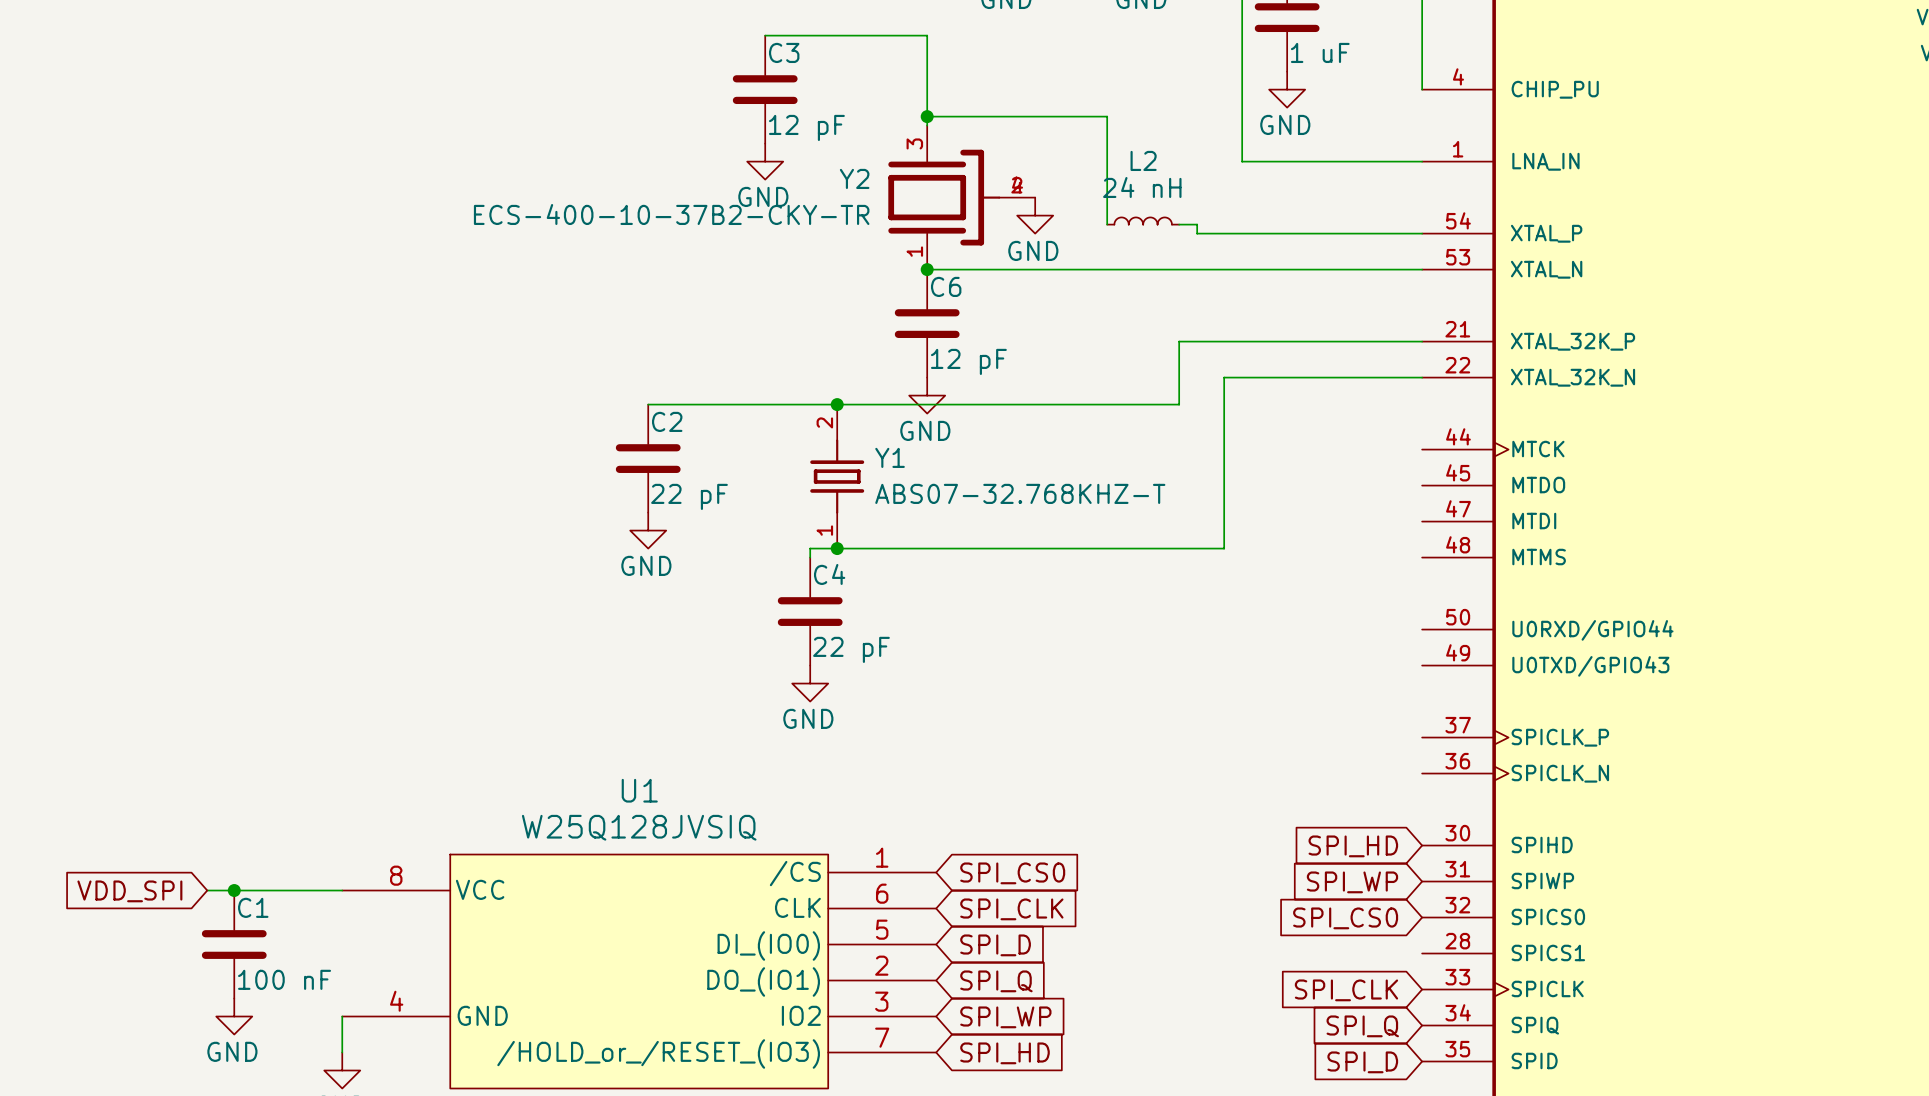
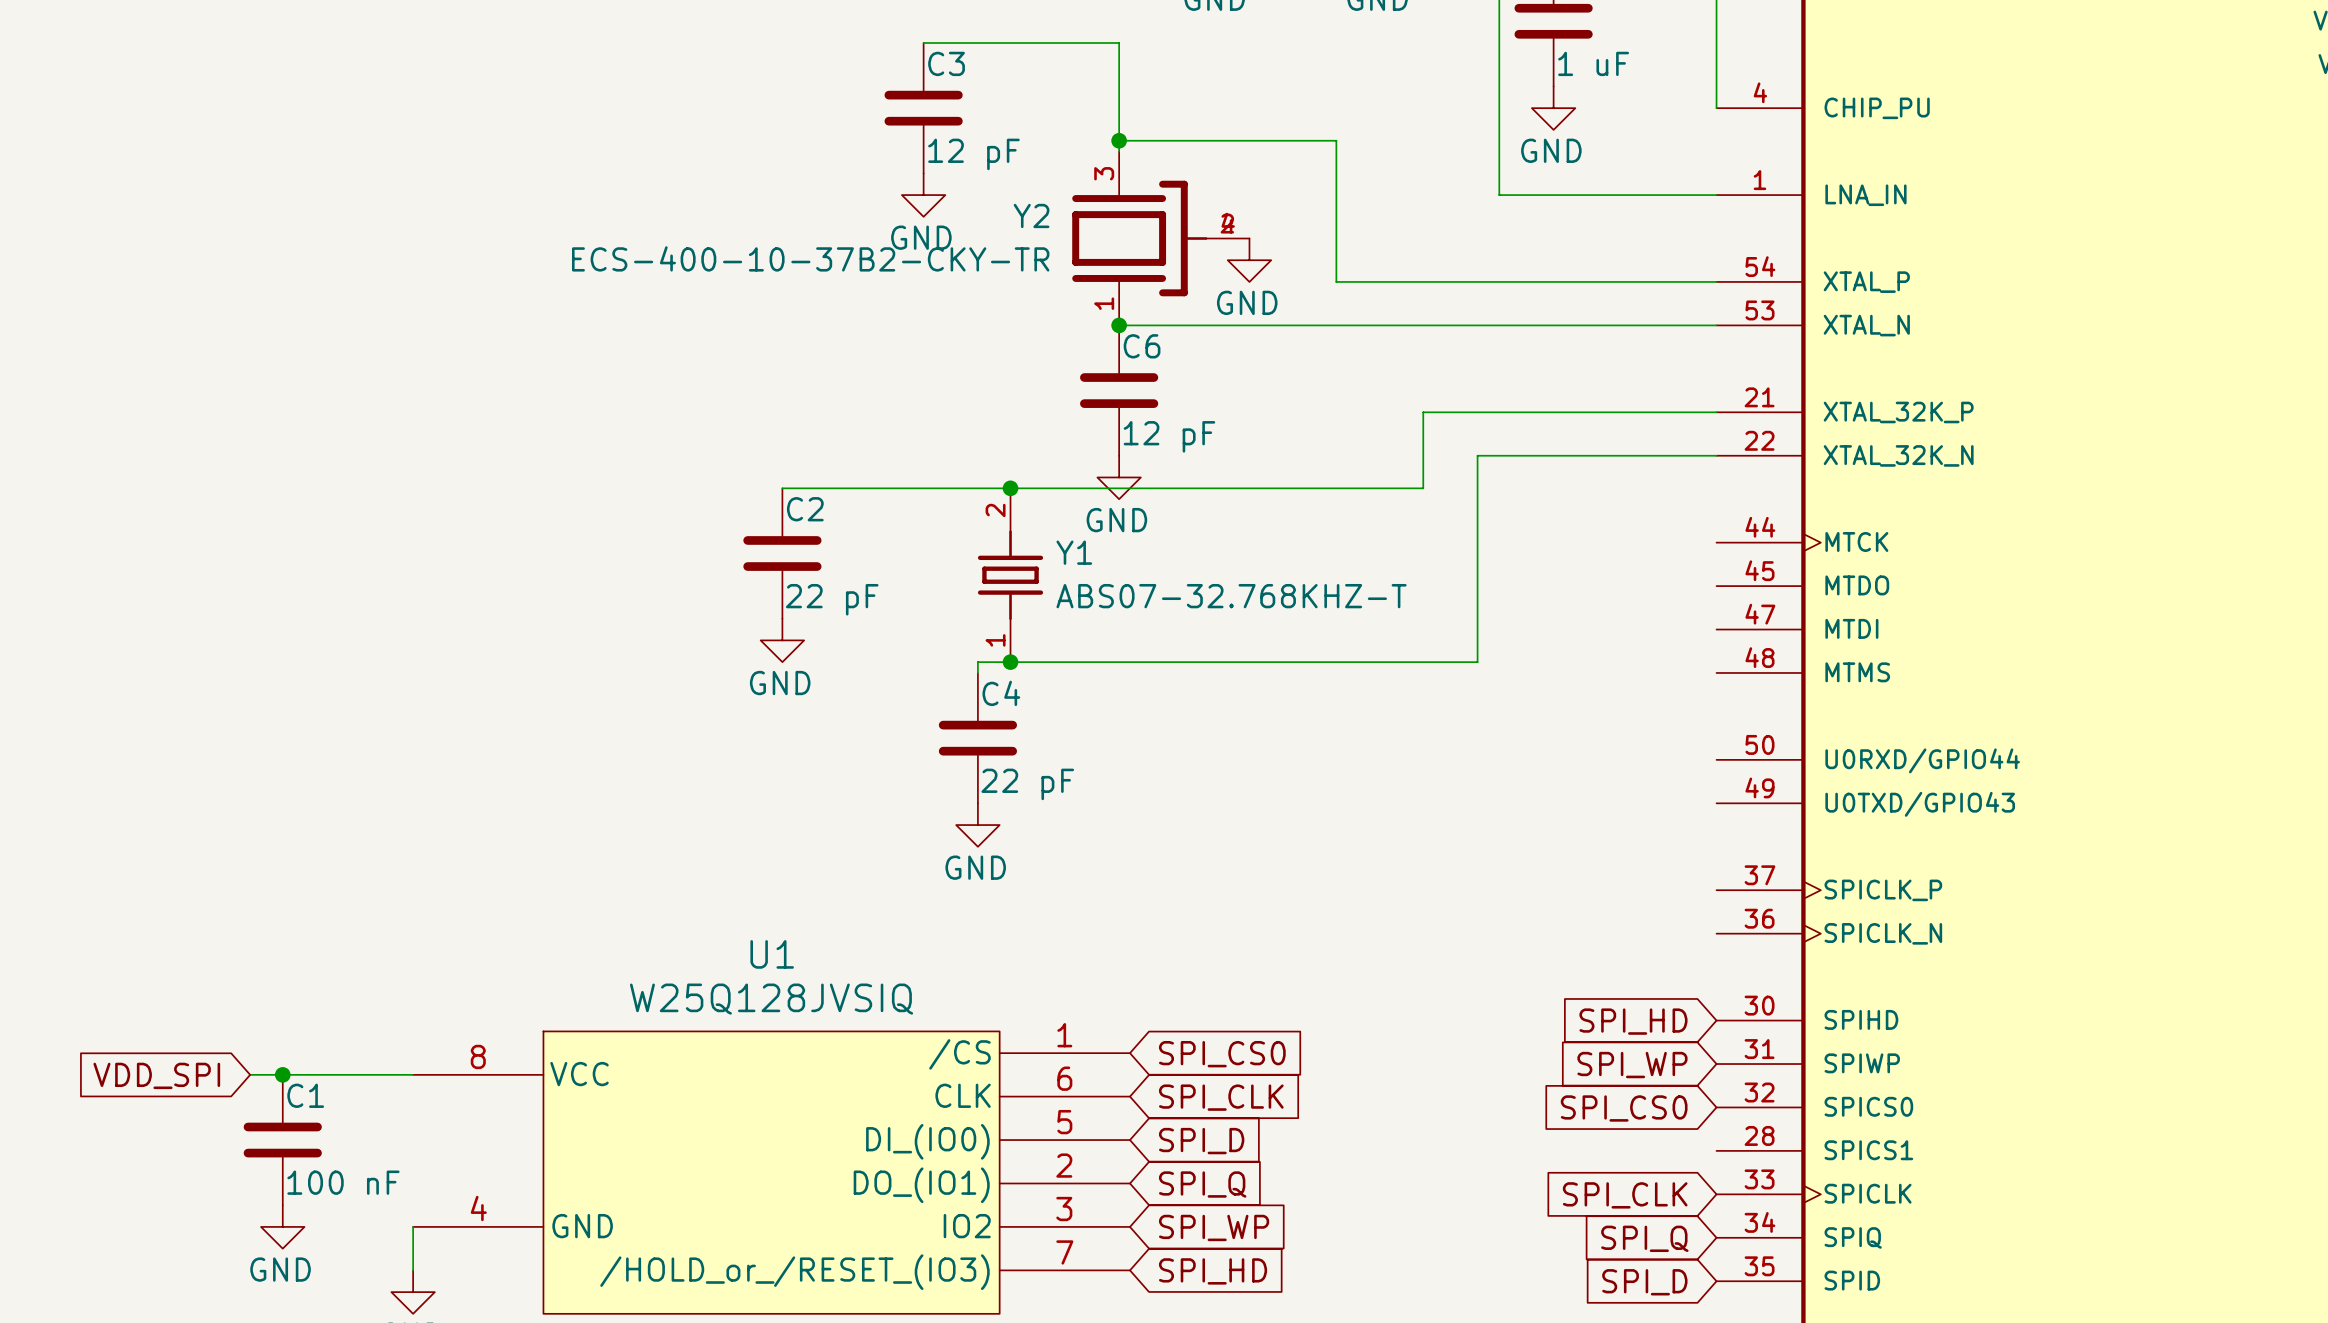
L2: 24 nH (1143, 221) -> none
wire: (1179, 224) (1197, 224) (1197, 233) -> (1336, 271) (1336, 281) (1444, 281)

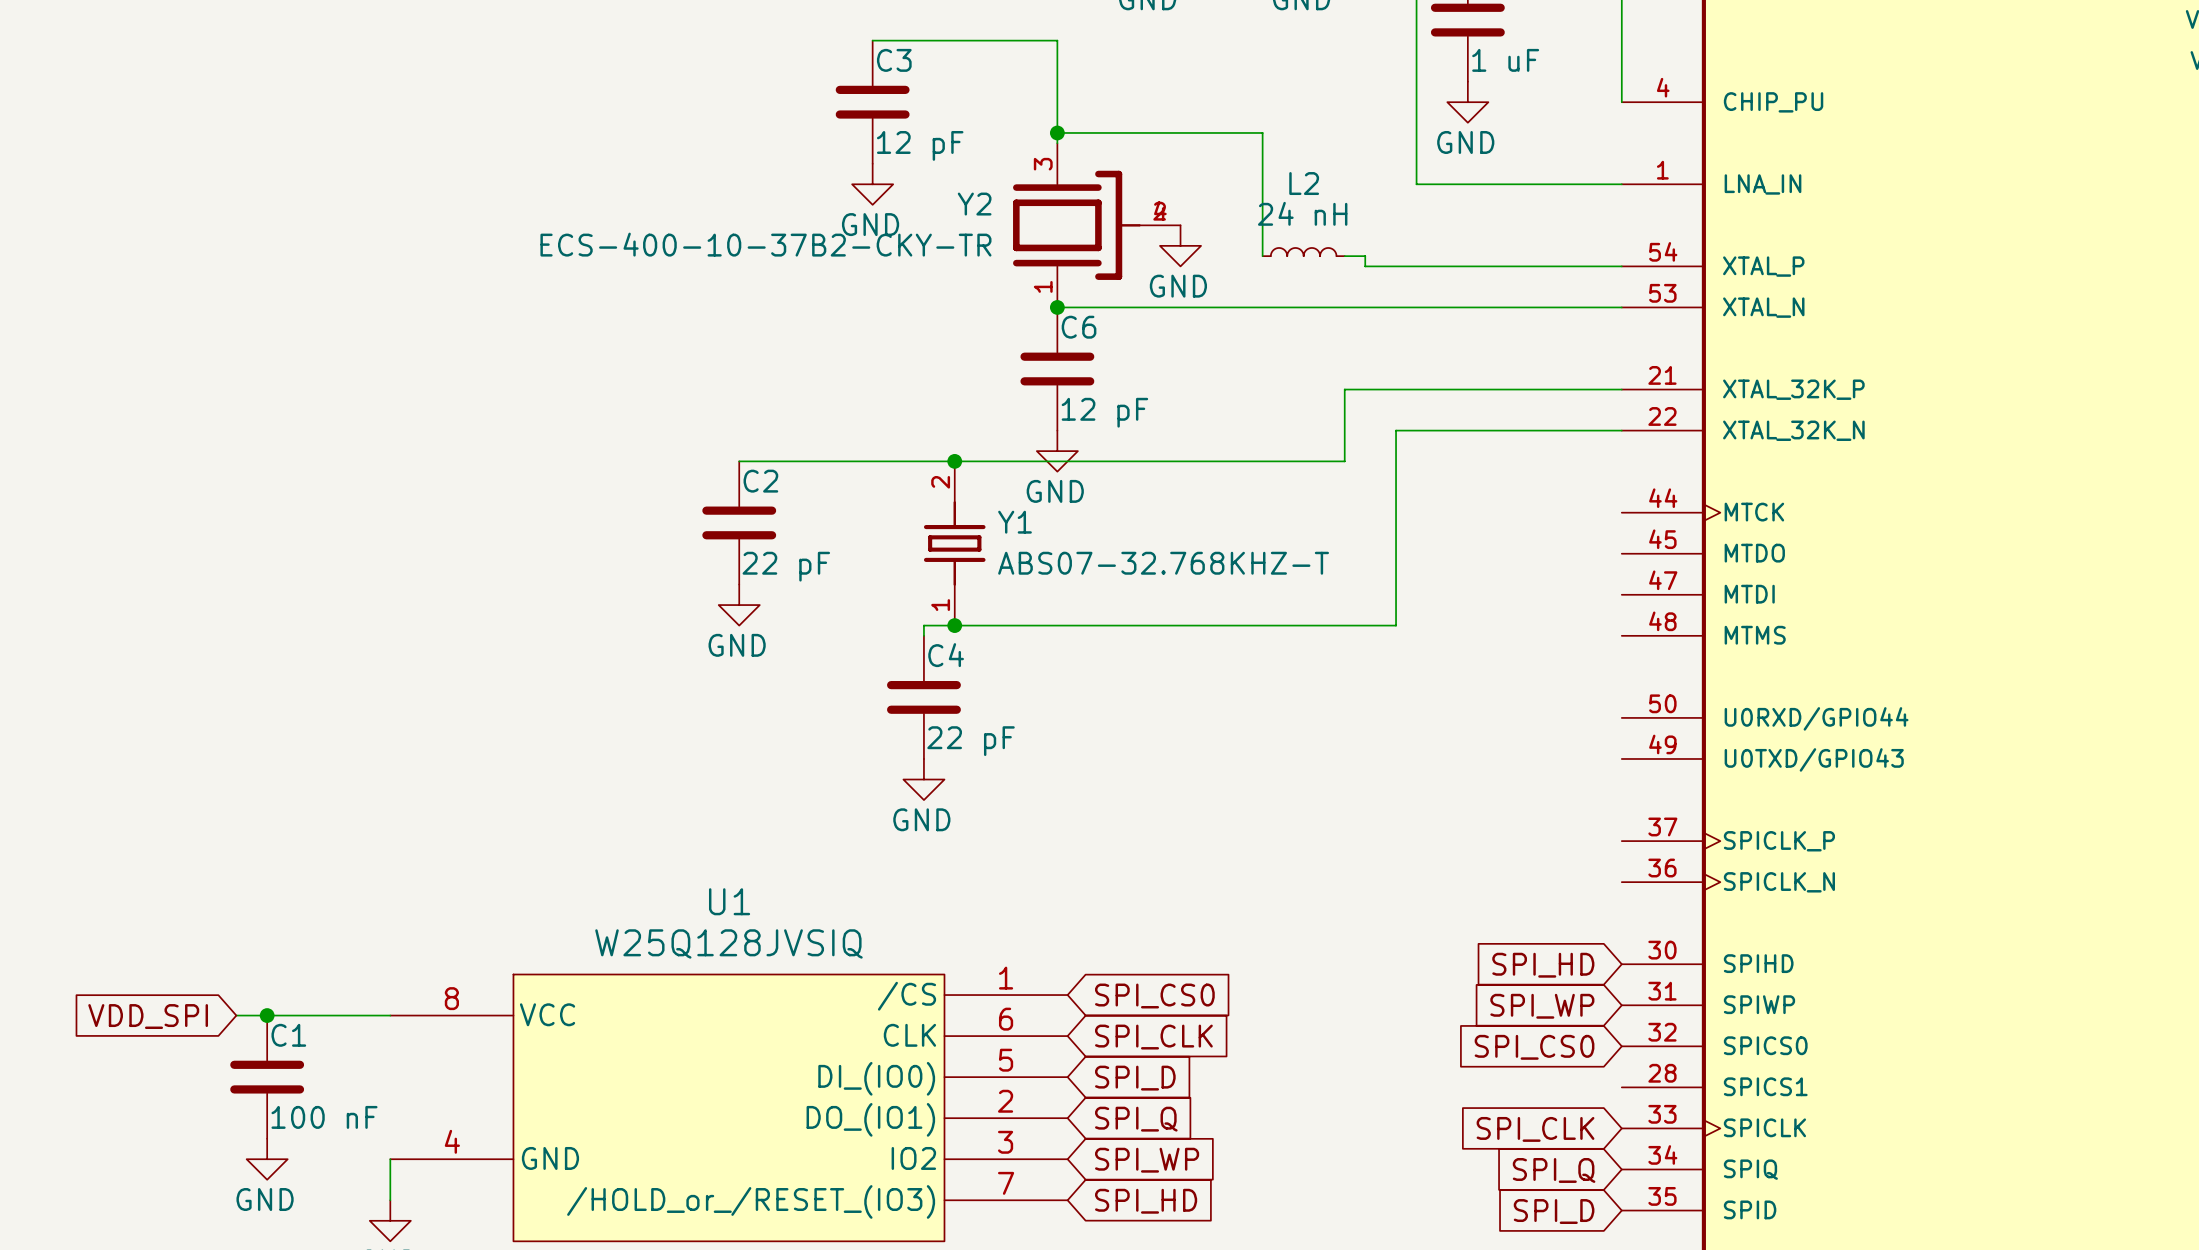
L2: none -> 24 nH (1303, 252)
wire: (1336, 271) (1336, 281) (1444, 281) -> (1344, 256) (1365, 256) (1365, 266)

